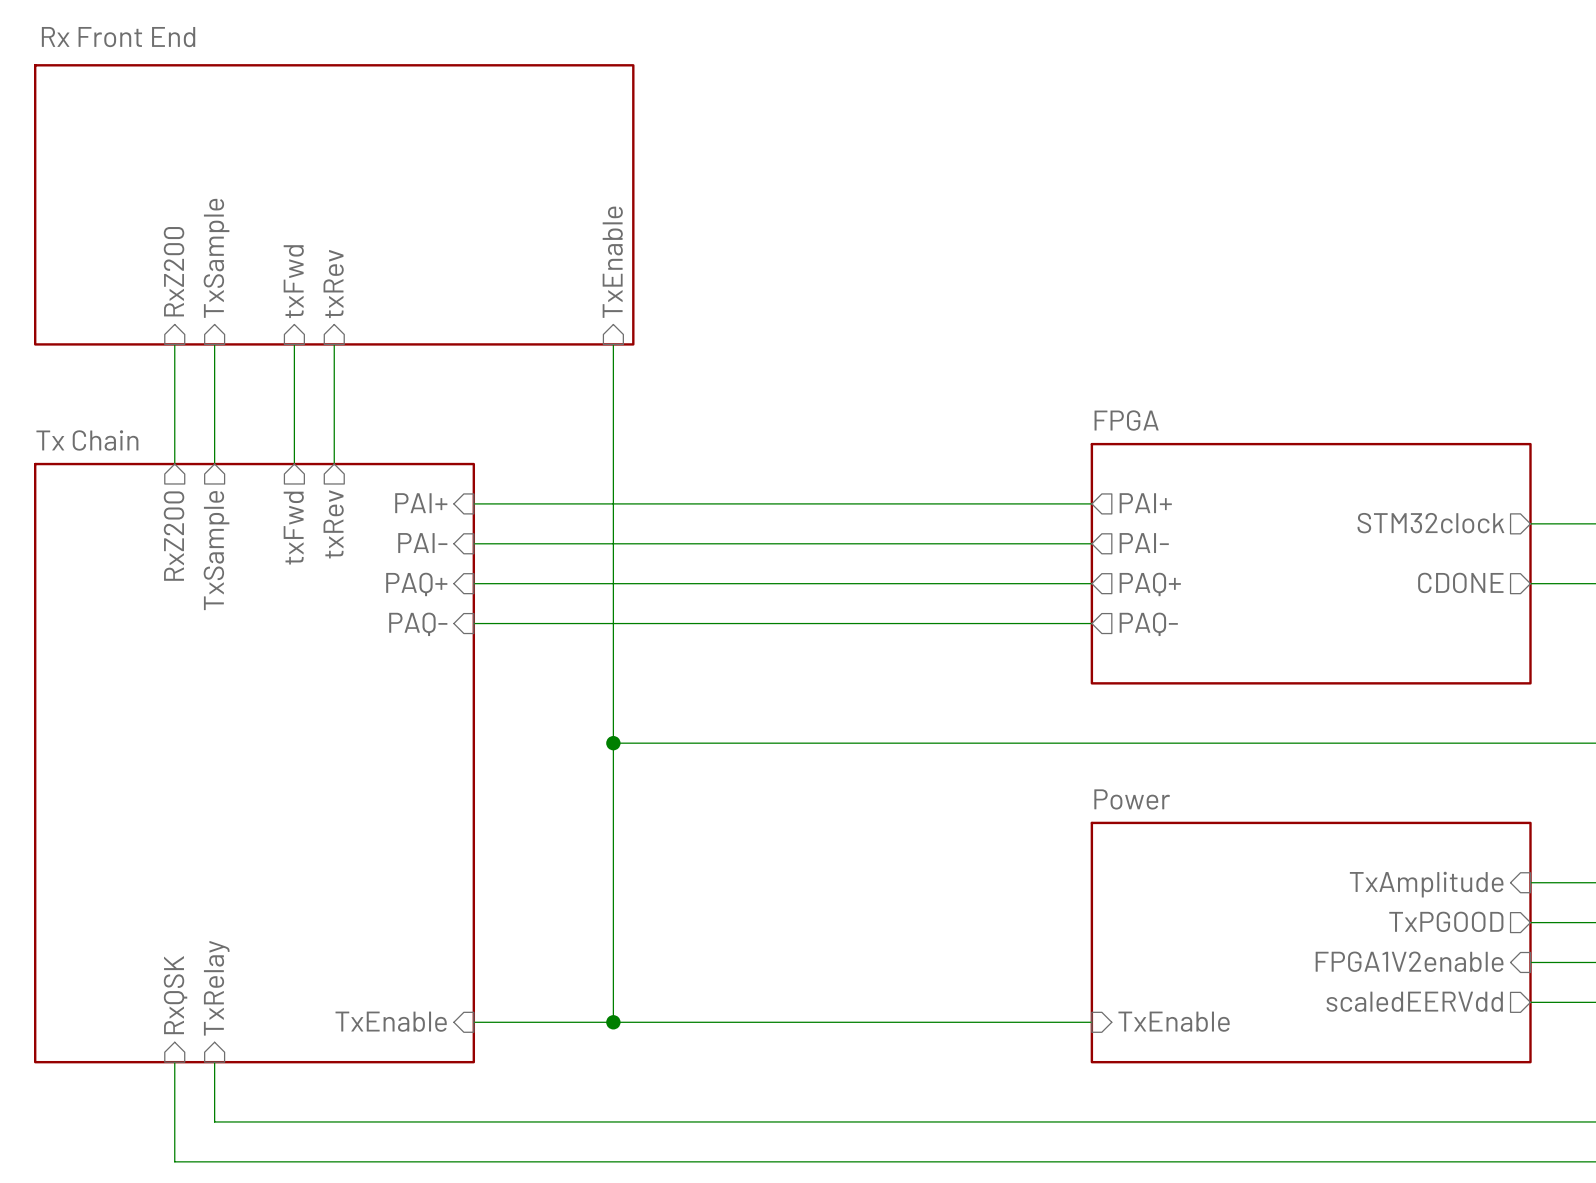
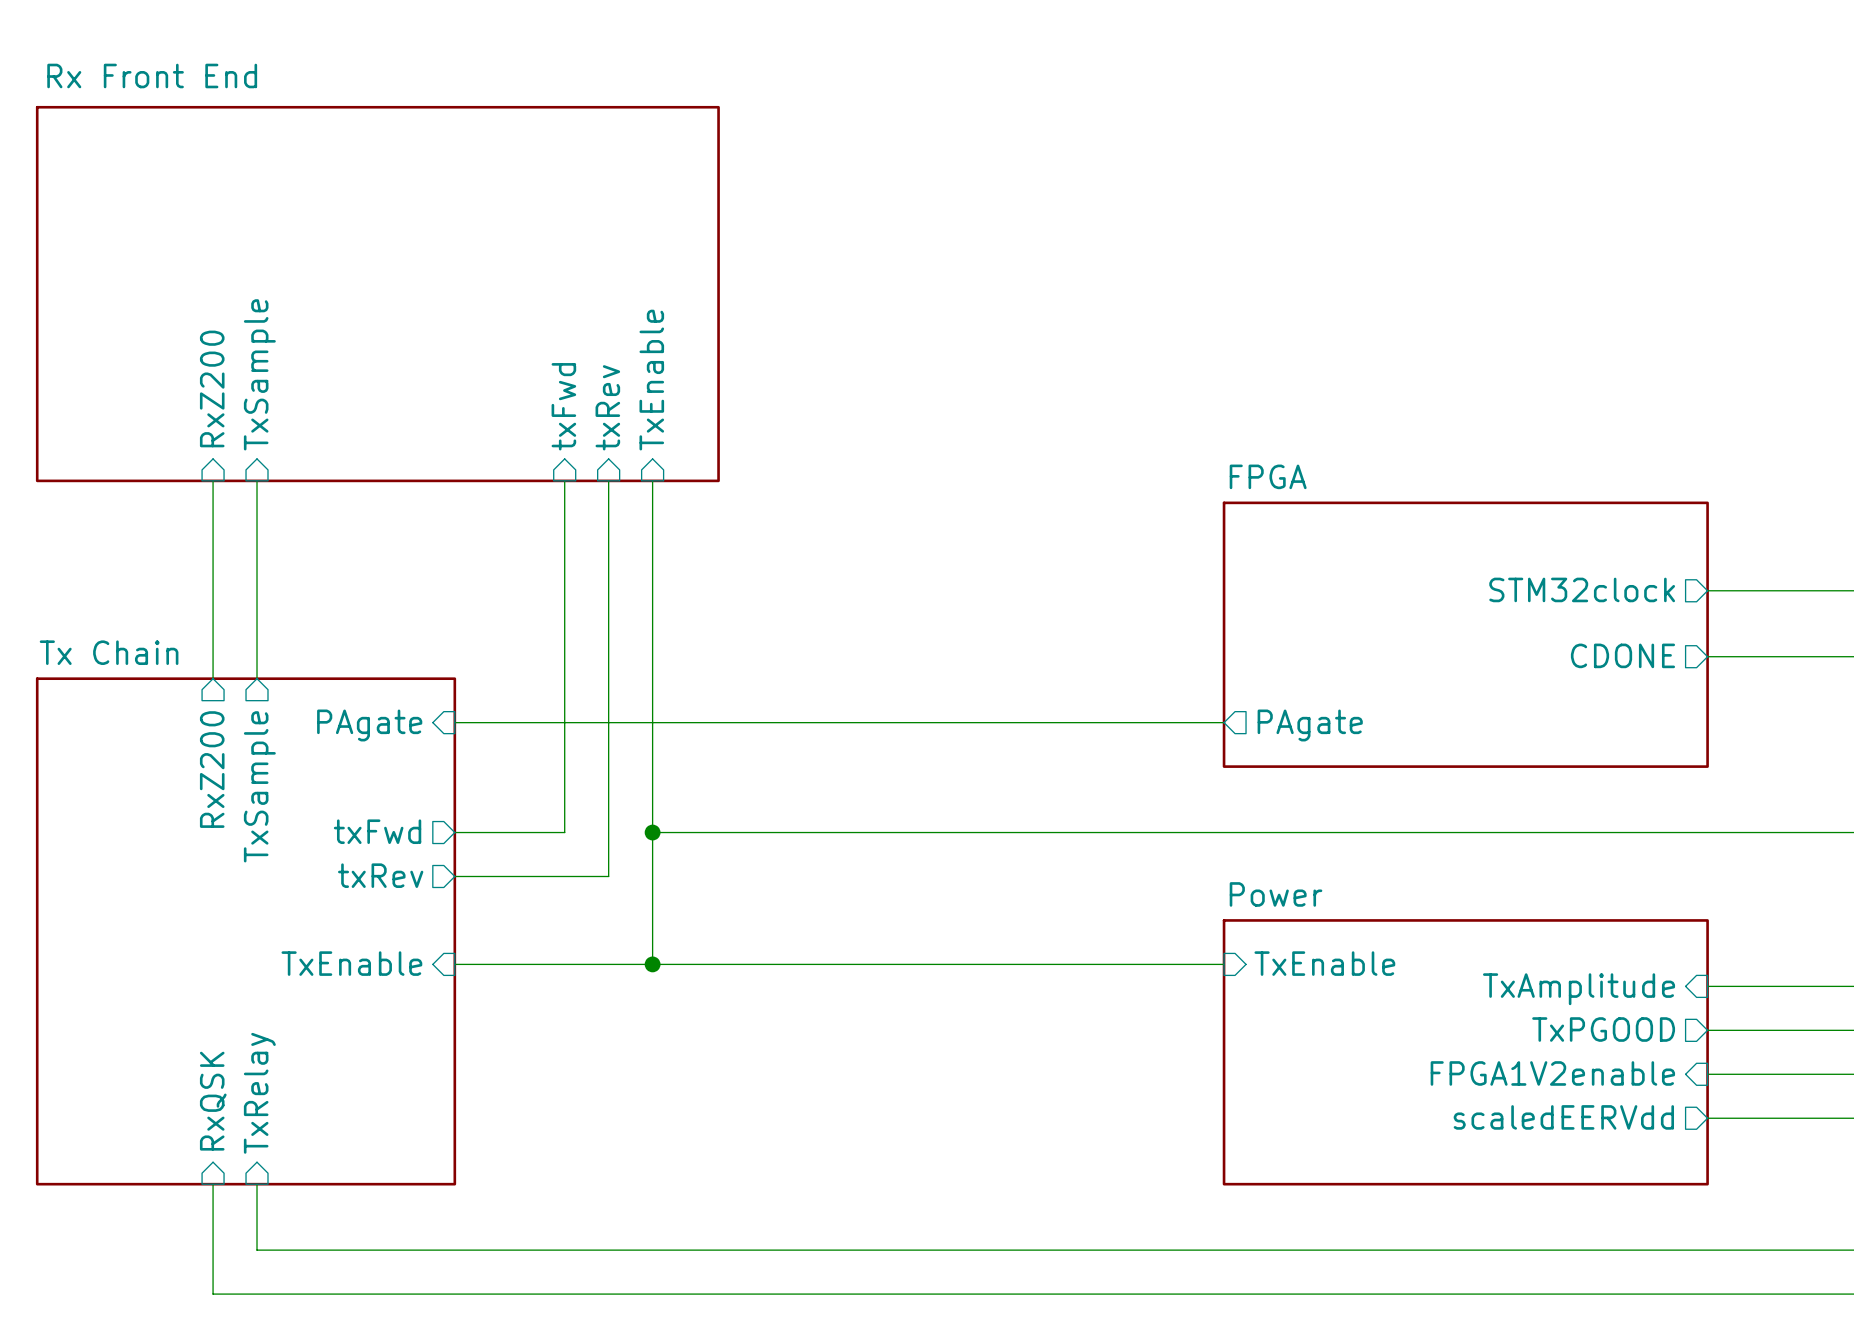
sheet Rx Front End: (334, 204) -> none
sheet Rx Front End: none -> (377, 294)
sheet pin position: TxSample (216, 258) -> TxSample (259, 374)
sheet pin position: TxEnable (612, 262) -> TxEnable (651, 380)
sheet pin position: RxZ200 (174, 271) -> RxZ200 (212, 388)
sheet pin: txFwd (293, 281) -> none
sheet pin: txRev (333, 283) -> none
wire: (174, 344) (174, 424) -> none
wire: (214, 344) (214, 424) -> none
wire: (294, 344) (294, 464) -> none
wire: (334, 344) (334, 464) -> none
wire: (613, 344) (613, 1022) -> none
sheet pin: none -> txFwd (563, 406)
sheet pin: none -> txRev (607, 407)
wire: none -> (564, 480) (564, 832) (454, 832)
wire: none -> (608, 480) (608, 876) (454, 876)
wire: none -> (652, 480) (652, 964)
wire: none -> (213, 524) (213, 678)
wire: none -> (257, 524) (257, 678)
sheet pin: PAI+ (421, 503) -> none
wire: (473, 503) (1091, 503) -> none
sheet pin: PAI+ (1145, 503) -> none
sheet pin: txRev (333, 524) -> none
sheet pin: txFwd (293, 528) -> none
sheet pin: RxZ200 (174, 536) -> none
sheet pin: PAI- (422, 543) -> none
wire: (473, 543) (1091, 543) -> none
sheet pin: PAI- (1144, 543) -> none
sheet pin position: TxSample (216, 550) -> TxSample (259, 786)
wire: (473, 583) (1091, 583) -> none
sheet pin: PAQ+ (416, 584) -> none
sheet pin: PAQ+ (1150, 584) -> none
wire: (473, 623) (1091, 623) -> none
sheet pin: PAQ- (418, 624) -> none
sheet pin: PAQ- (1148, 624) -> none
wire: none -> (454, 722) (1224, 722)
sheet pin: none -> PAgate (369, 725)
sheet pin: none -> PAgate (1310, 725)
sheet pin: none -> RxZ200 (212, 769)
sheet pin: none -> txFwd (377, 831)
wire: none -> (652, 832) (696, 832)
junction position: (613, 743) -> (652, 832)
sheet Tx Chain: (254, 763) -> none
sheet pin: none -> txRev (380, 875)
sheet Tx Chain: none -> (246, 931)
wire: none -> (454, 964) (1224, 964)
junction: none -> (652, 964)
sheet pin position: TxEnable (391, 1021) -> TxEnable (351, 963)
sheet pin position: TxEnable (1174, 1021) -> TxEnable (1324, 963)
wire: (473, 1022) (1091, 1022) -> none
junction: (613, 1022) -> none

